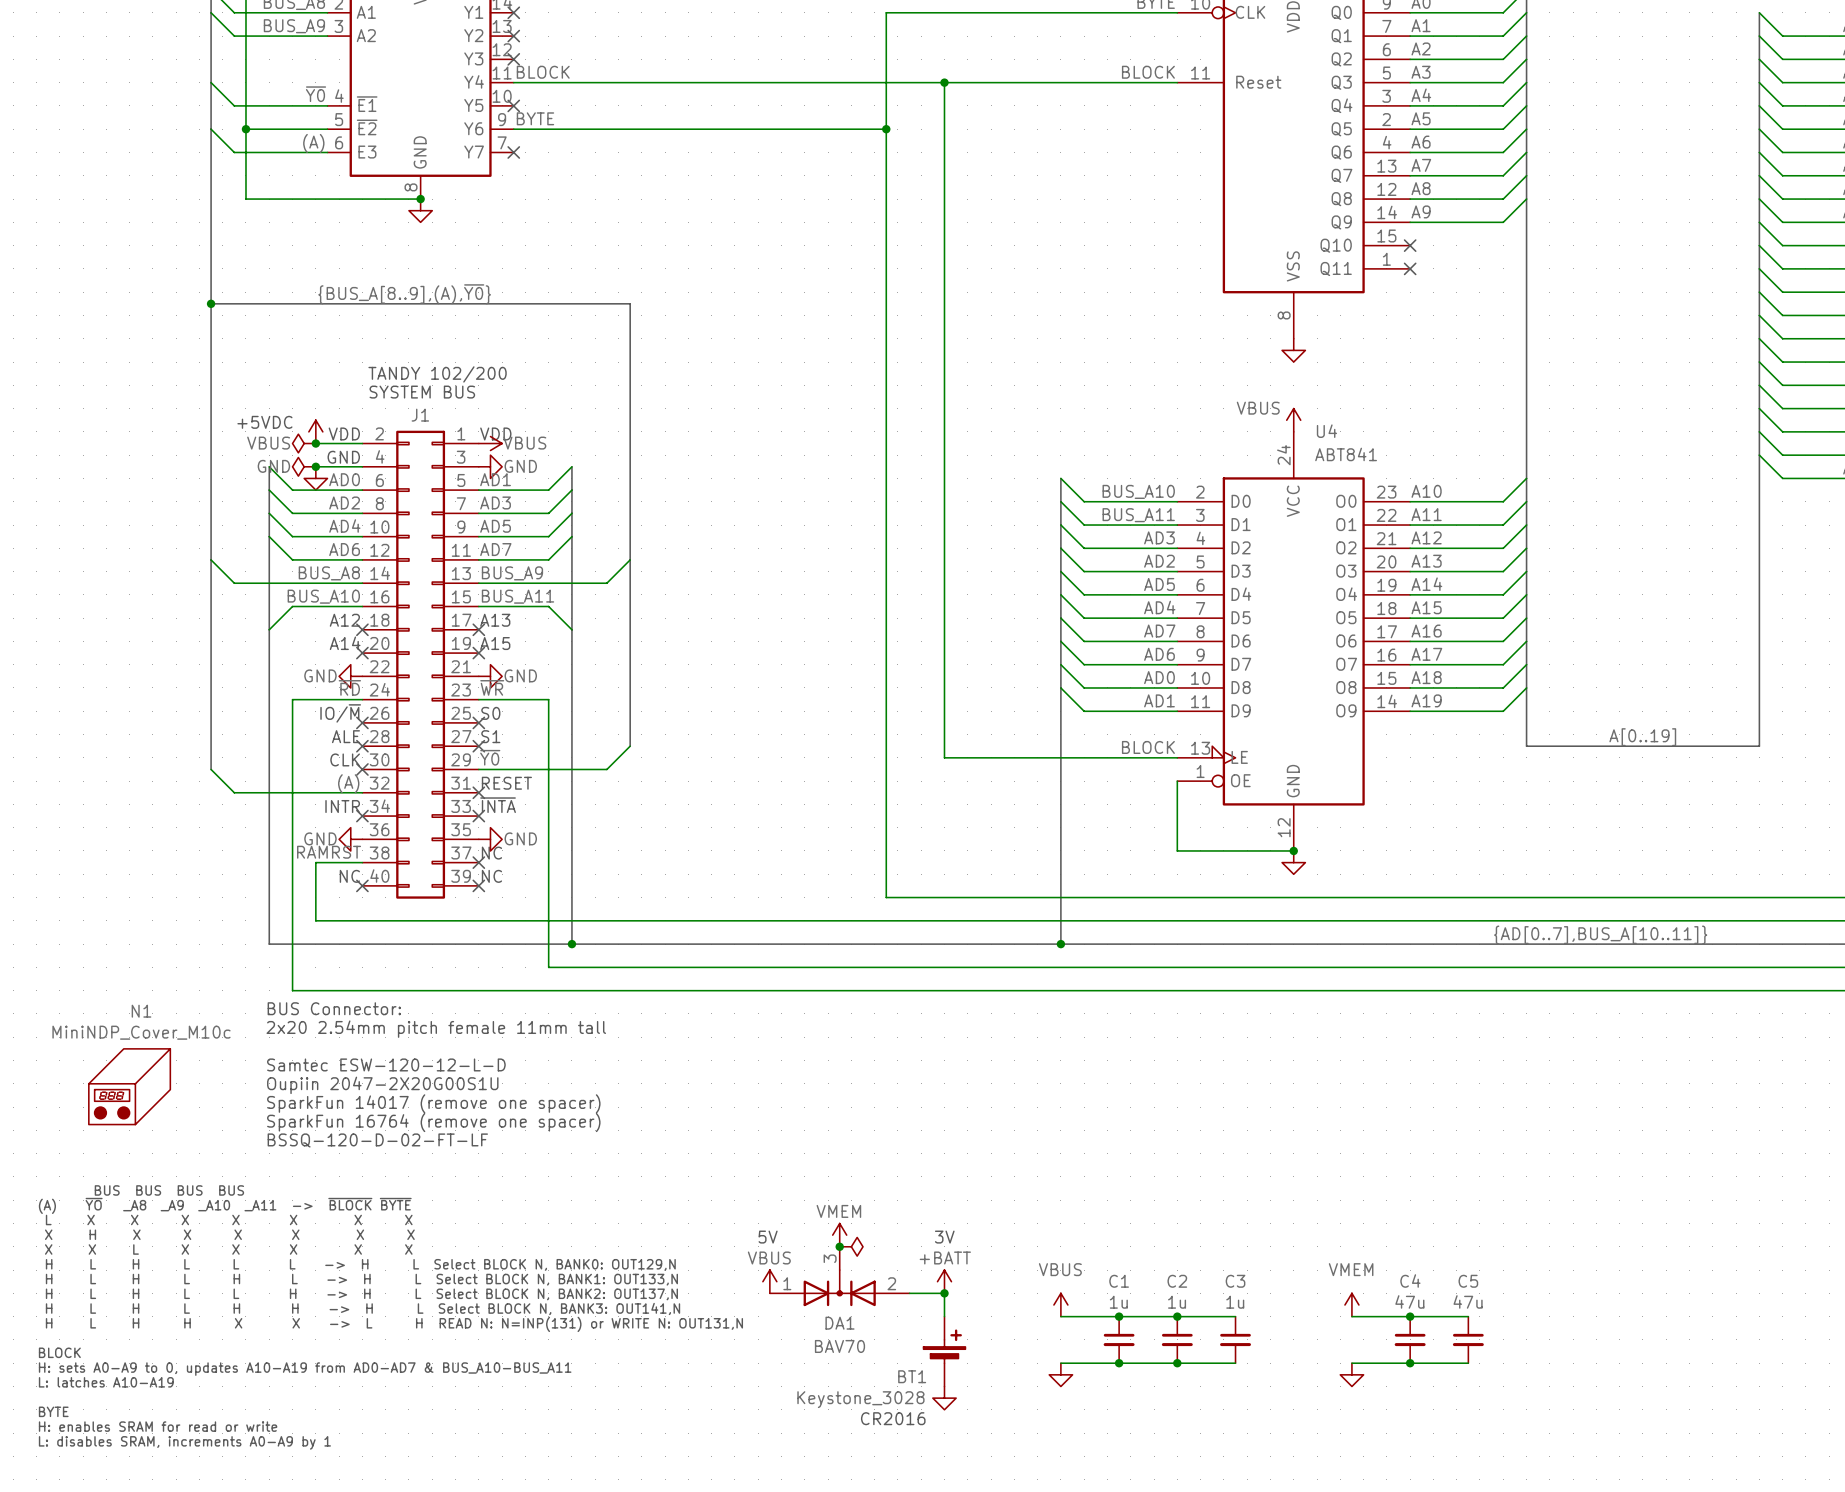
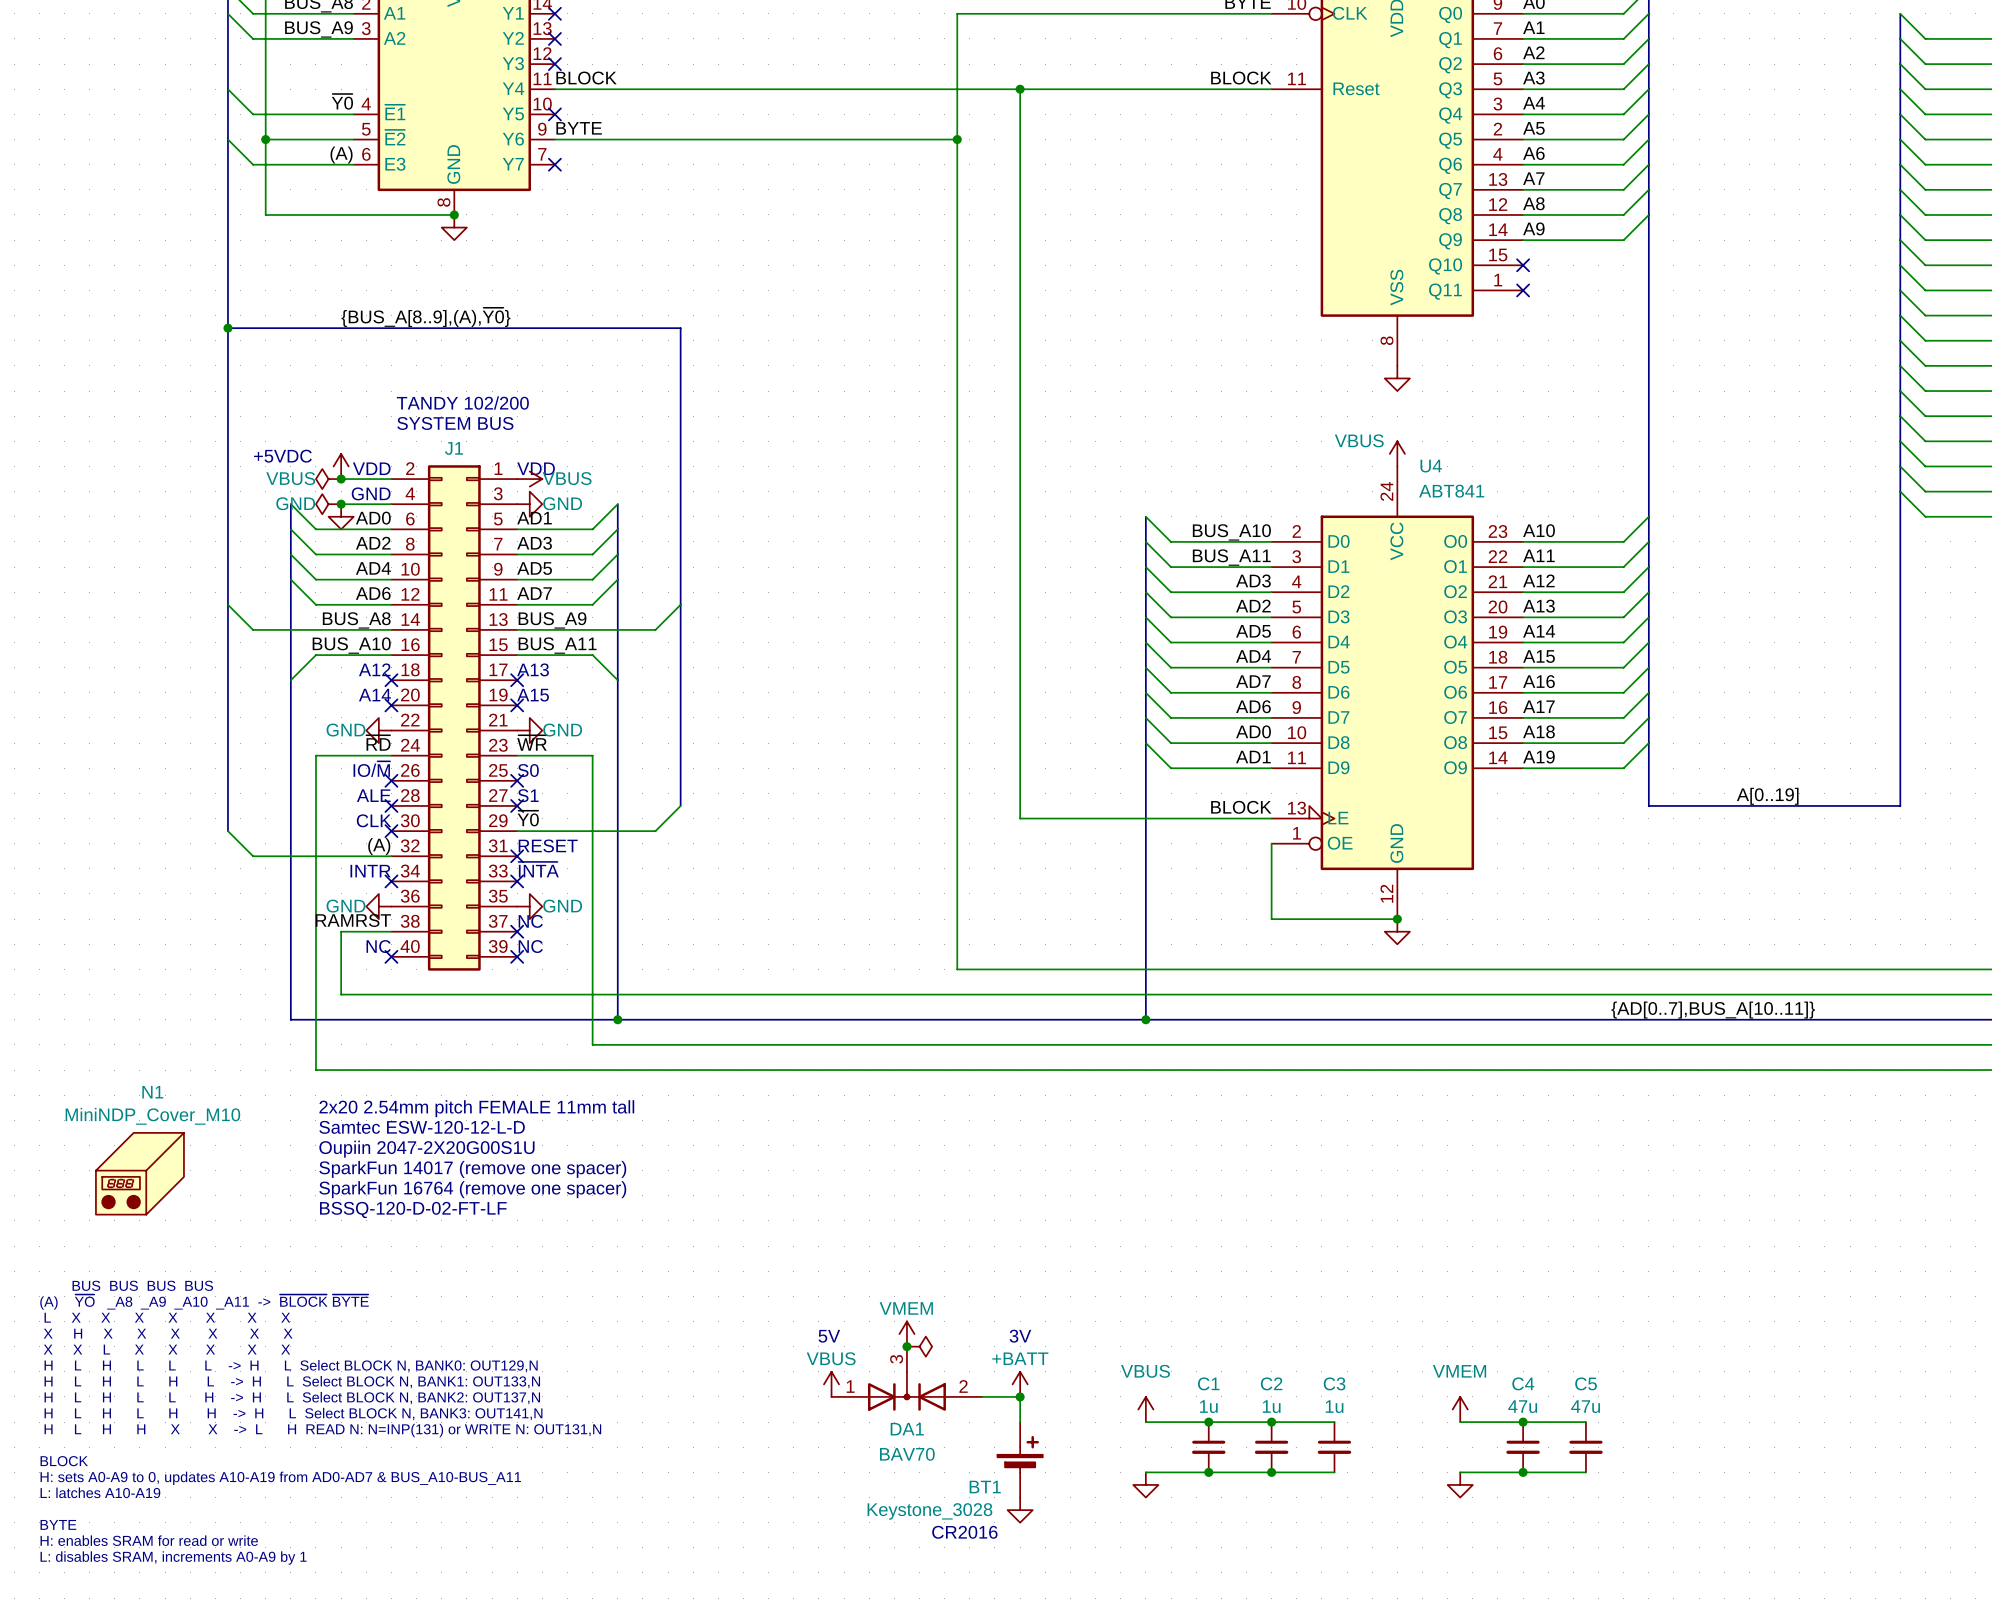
text: BUS Connector: (334, 1008) -> none
text: 2x20 2.54mm pitch female 11mm tall (436, 1029) -> 2x20 2.54mm pitch FEMALE 11mm tall (476, 1108)
N1 value: MiniNDP_Cover_M10c (141, 1032) -> MiniNDP_Cover_M10 (152, 1116)
text position: Samtec ESW-120-12-L-D (386, 1064) -> Samtec ESW-120-12-L-D (422, 1127)
text position: Oupiin 2047-2X20G00S1U (382, 1085) -> Oupiin 2047-2X20G00S1U (426, 1149)
text position: SparkFun 14017 (remove one spacer) (433, 1103) -> SparkFun 14017 (remove one spacer) (472, 1169)
text position: SparkFun 16764 (remove one spacer) (433, 1122) -> SparkFun 16764 (remove one spacer) (472, 1189)
text position: BSSQ-120-D-02-FT-LF (377, 1140) -> BSSQ-120-D-02-FT-LF (413, 1209)

